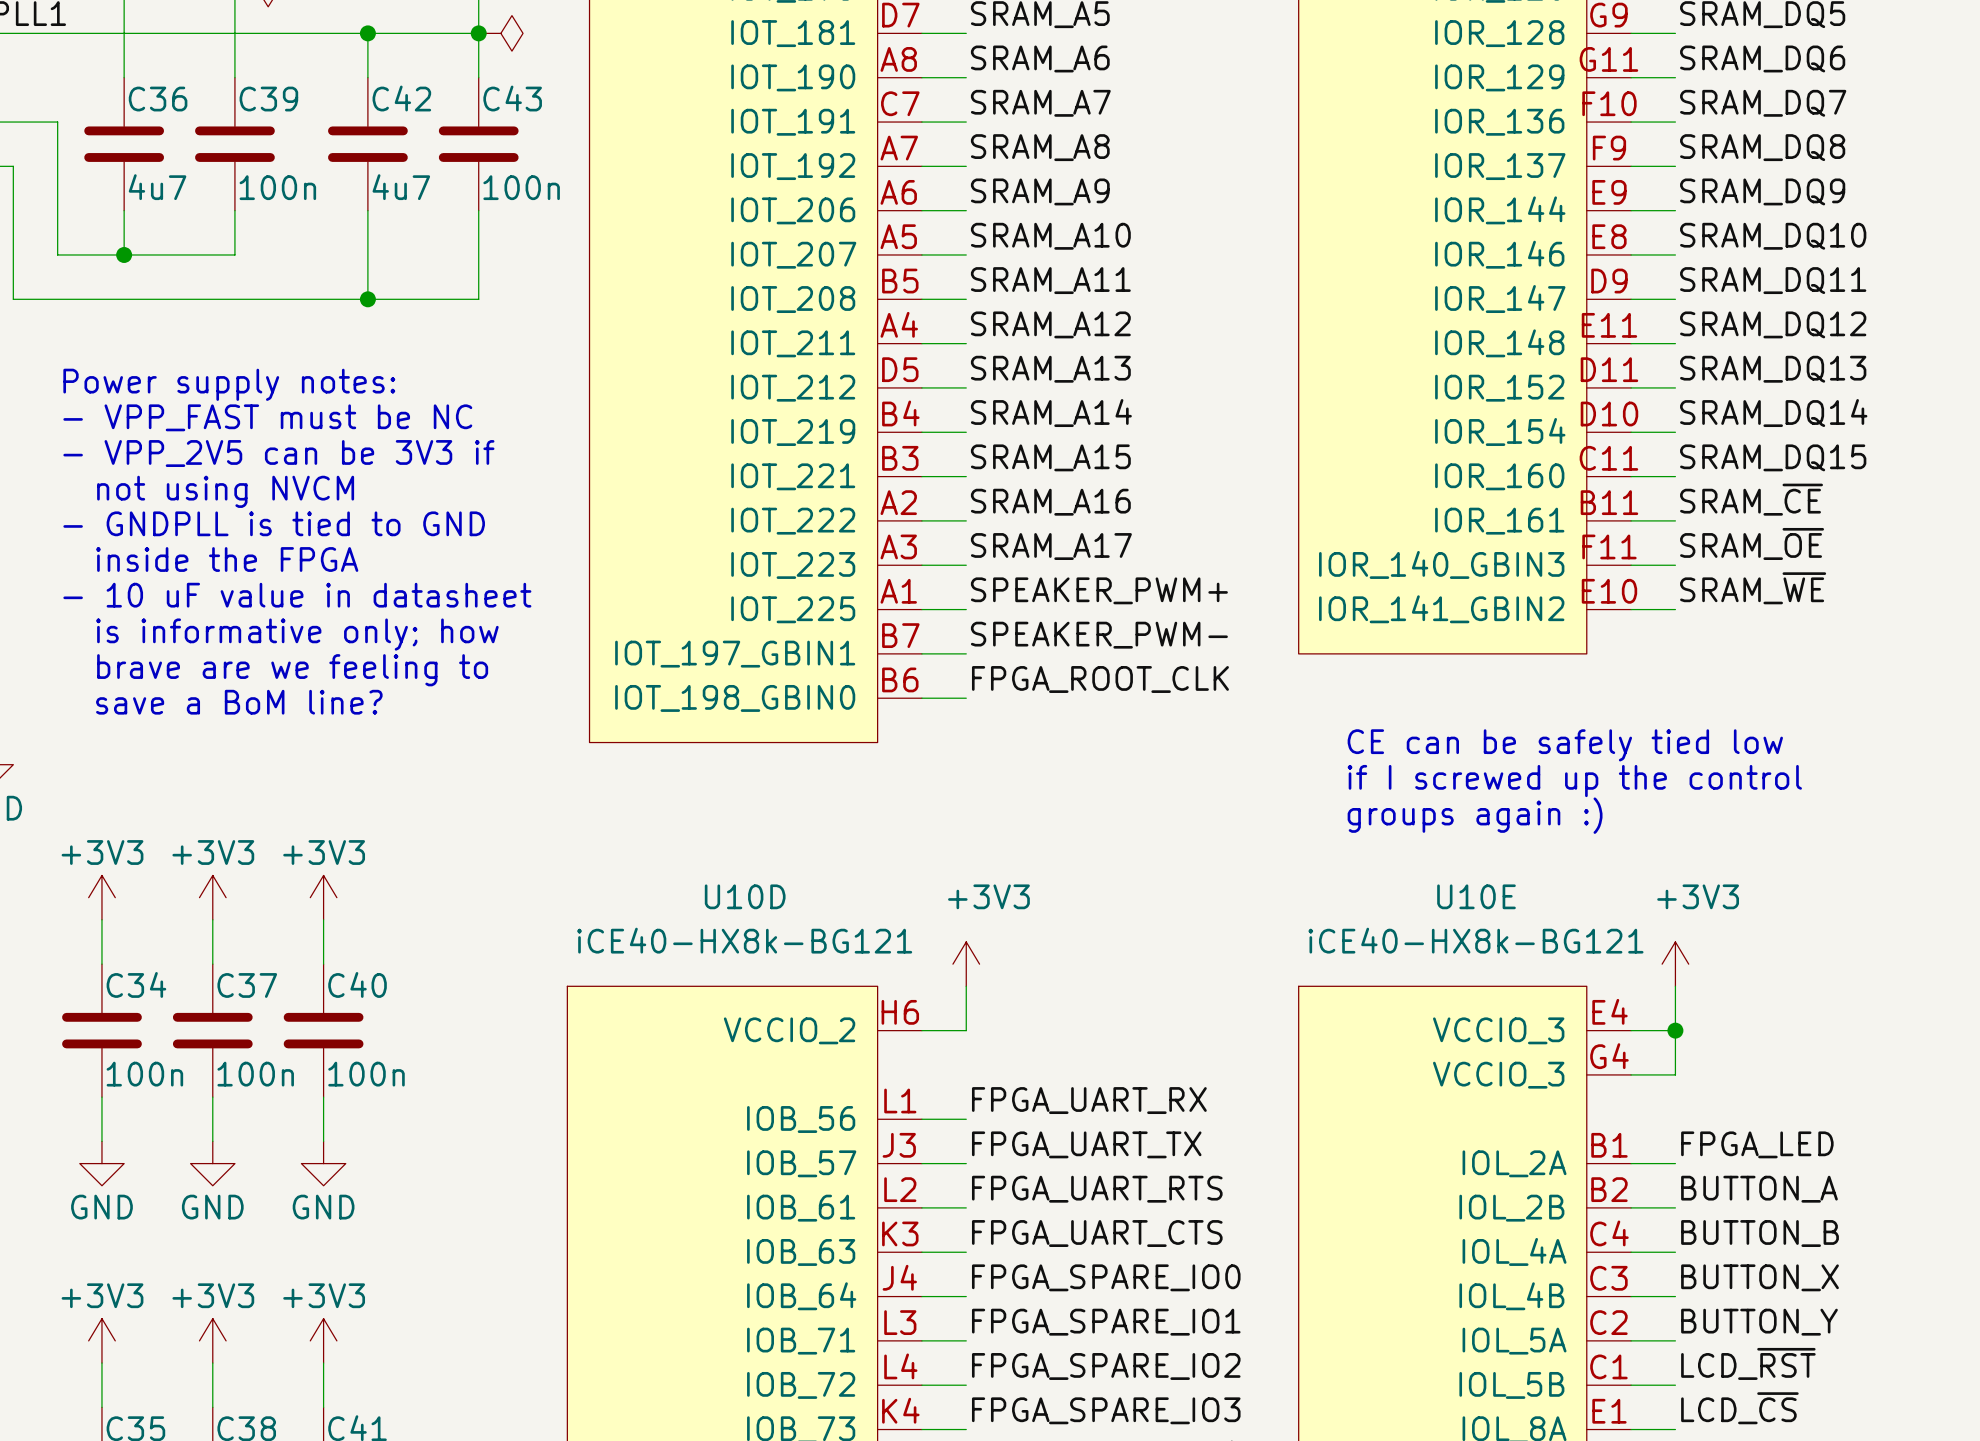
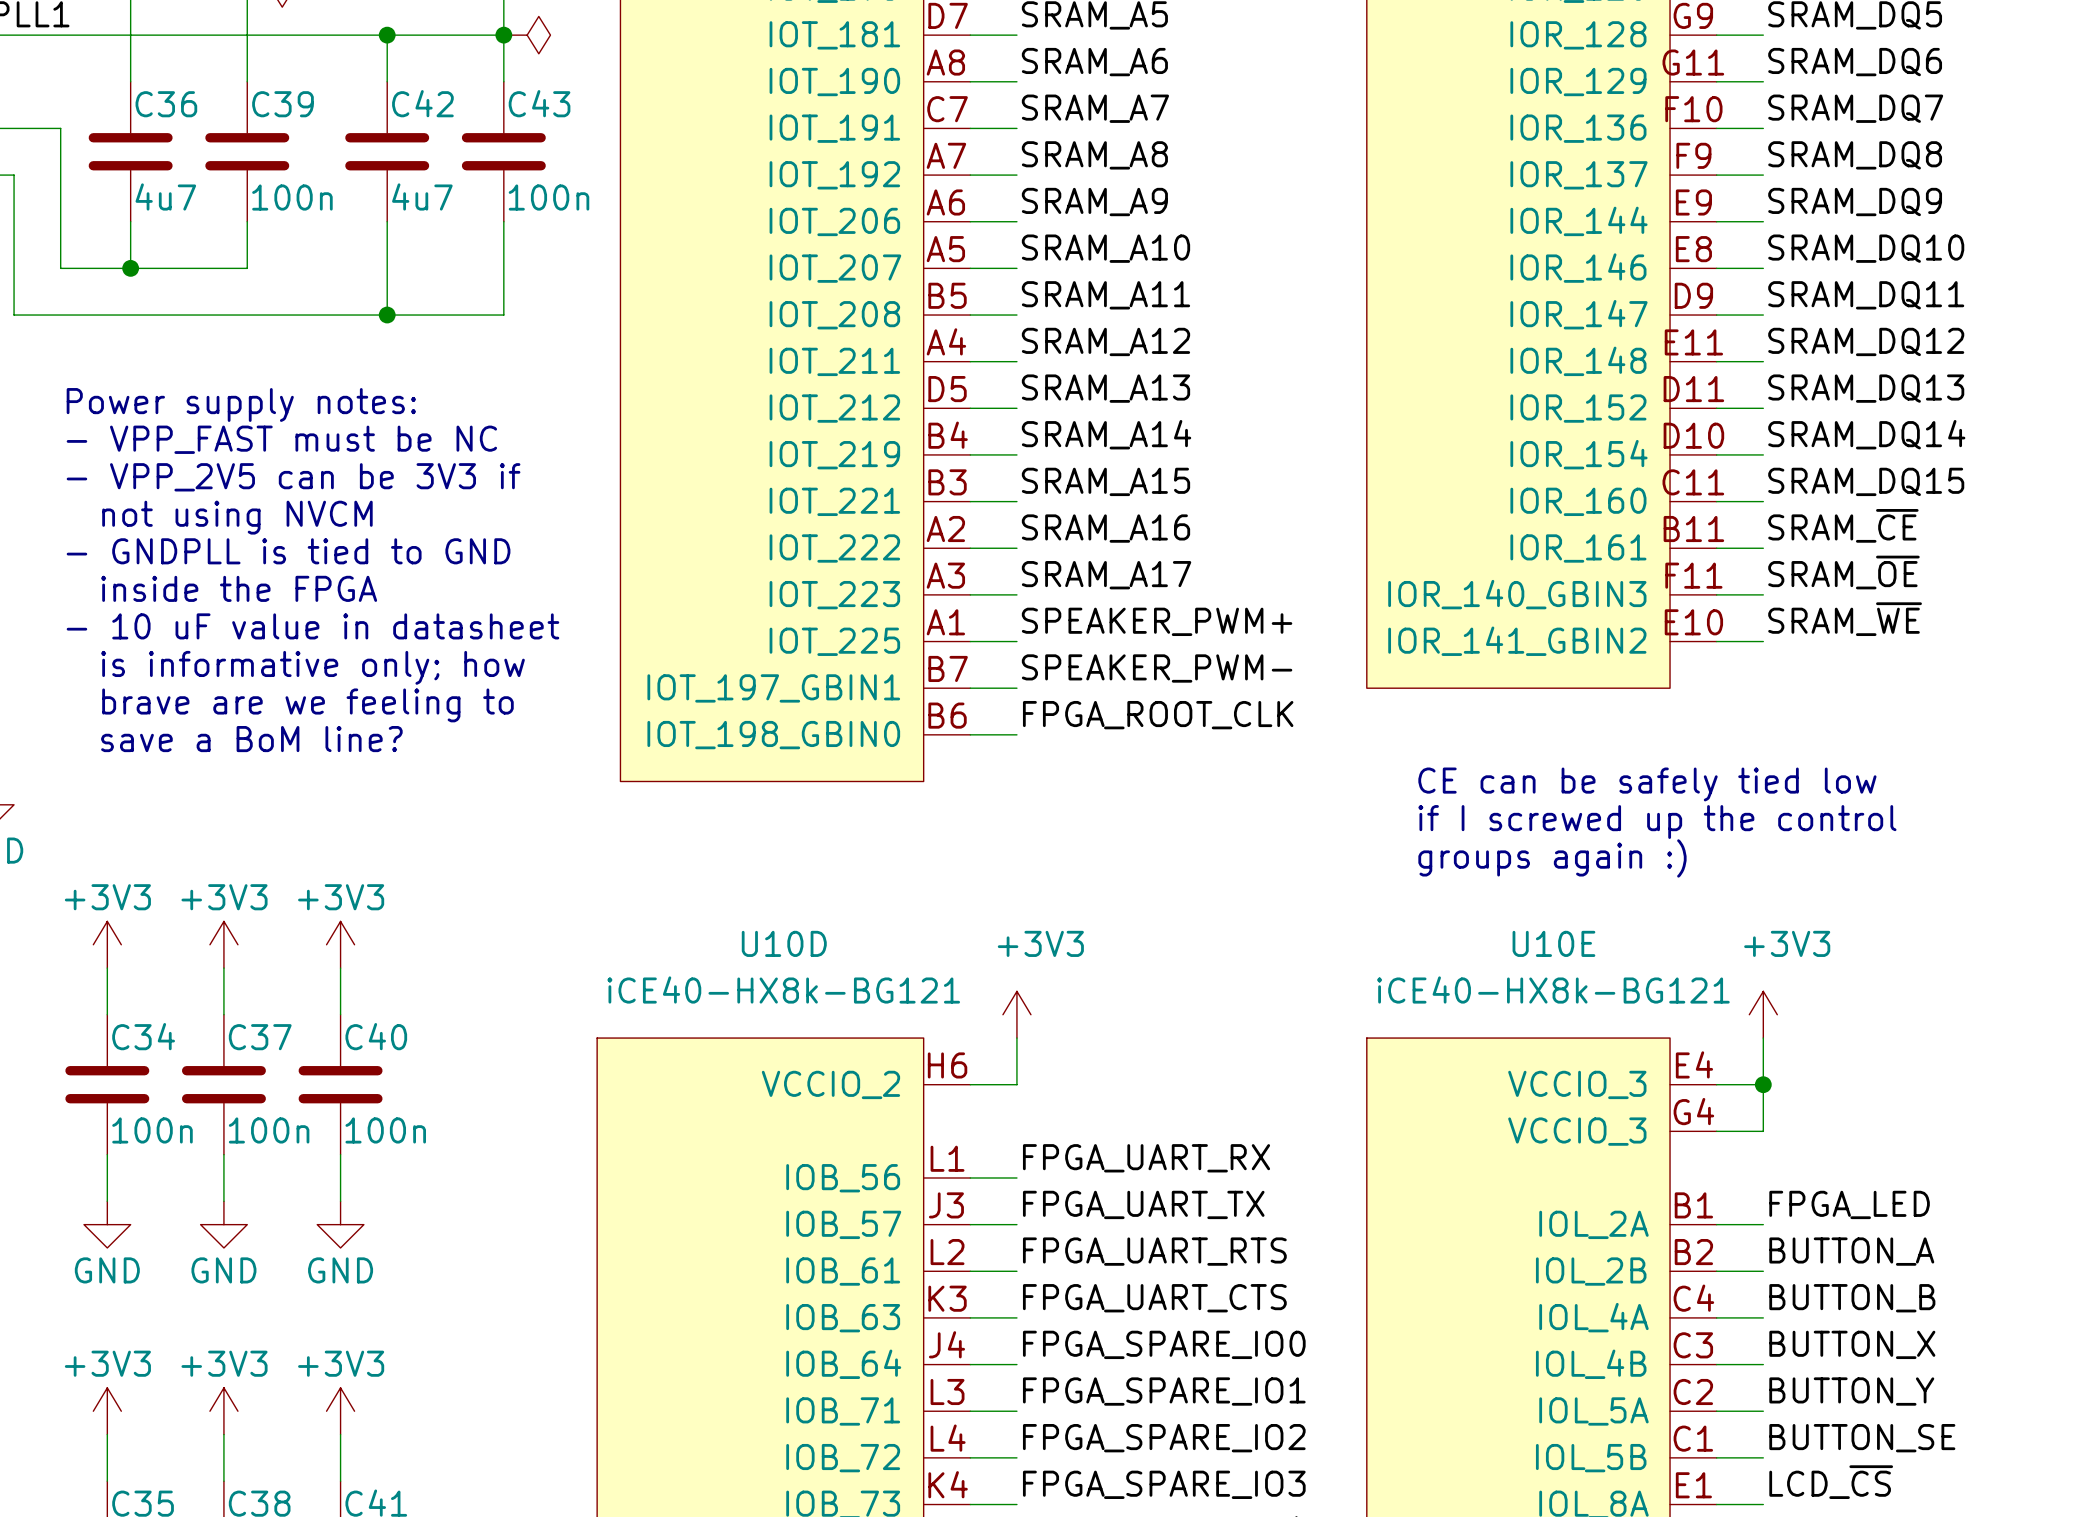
label: LCD_~{RST} (1748, 1363) -> BUTTON_SE (1862, 1438)

